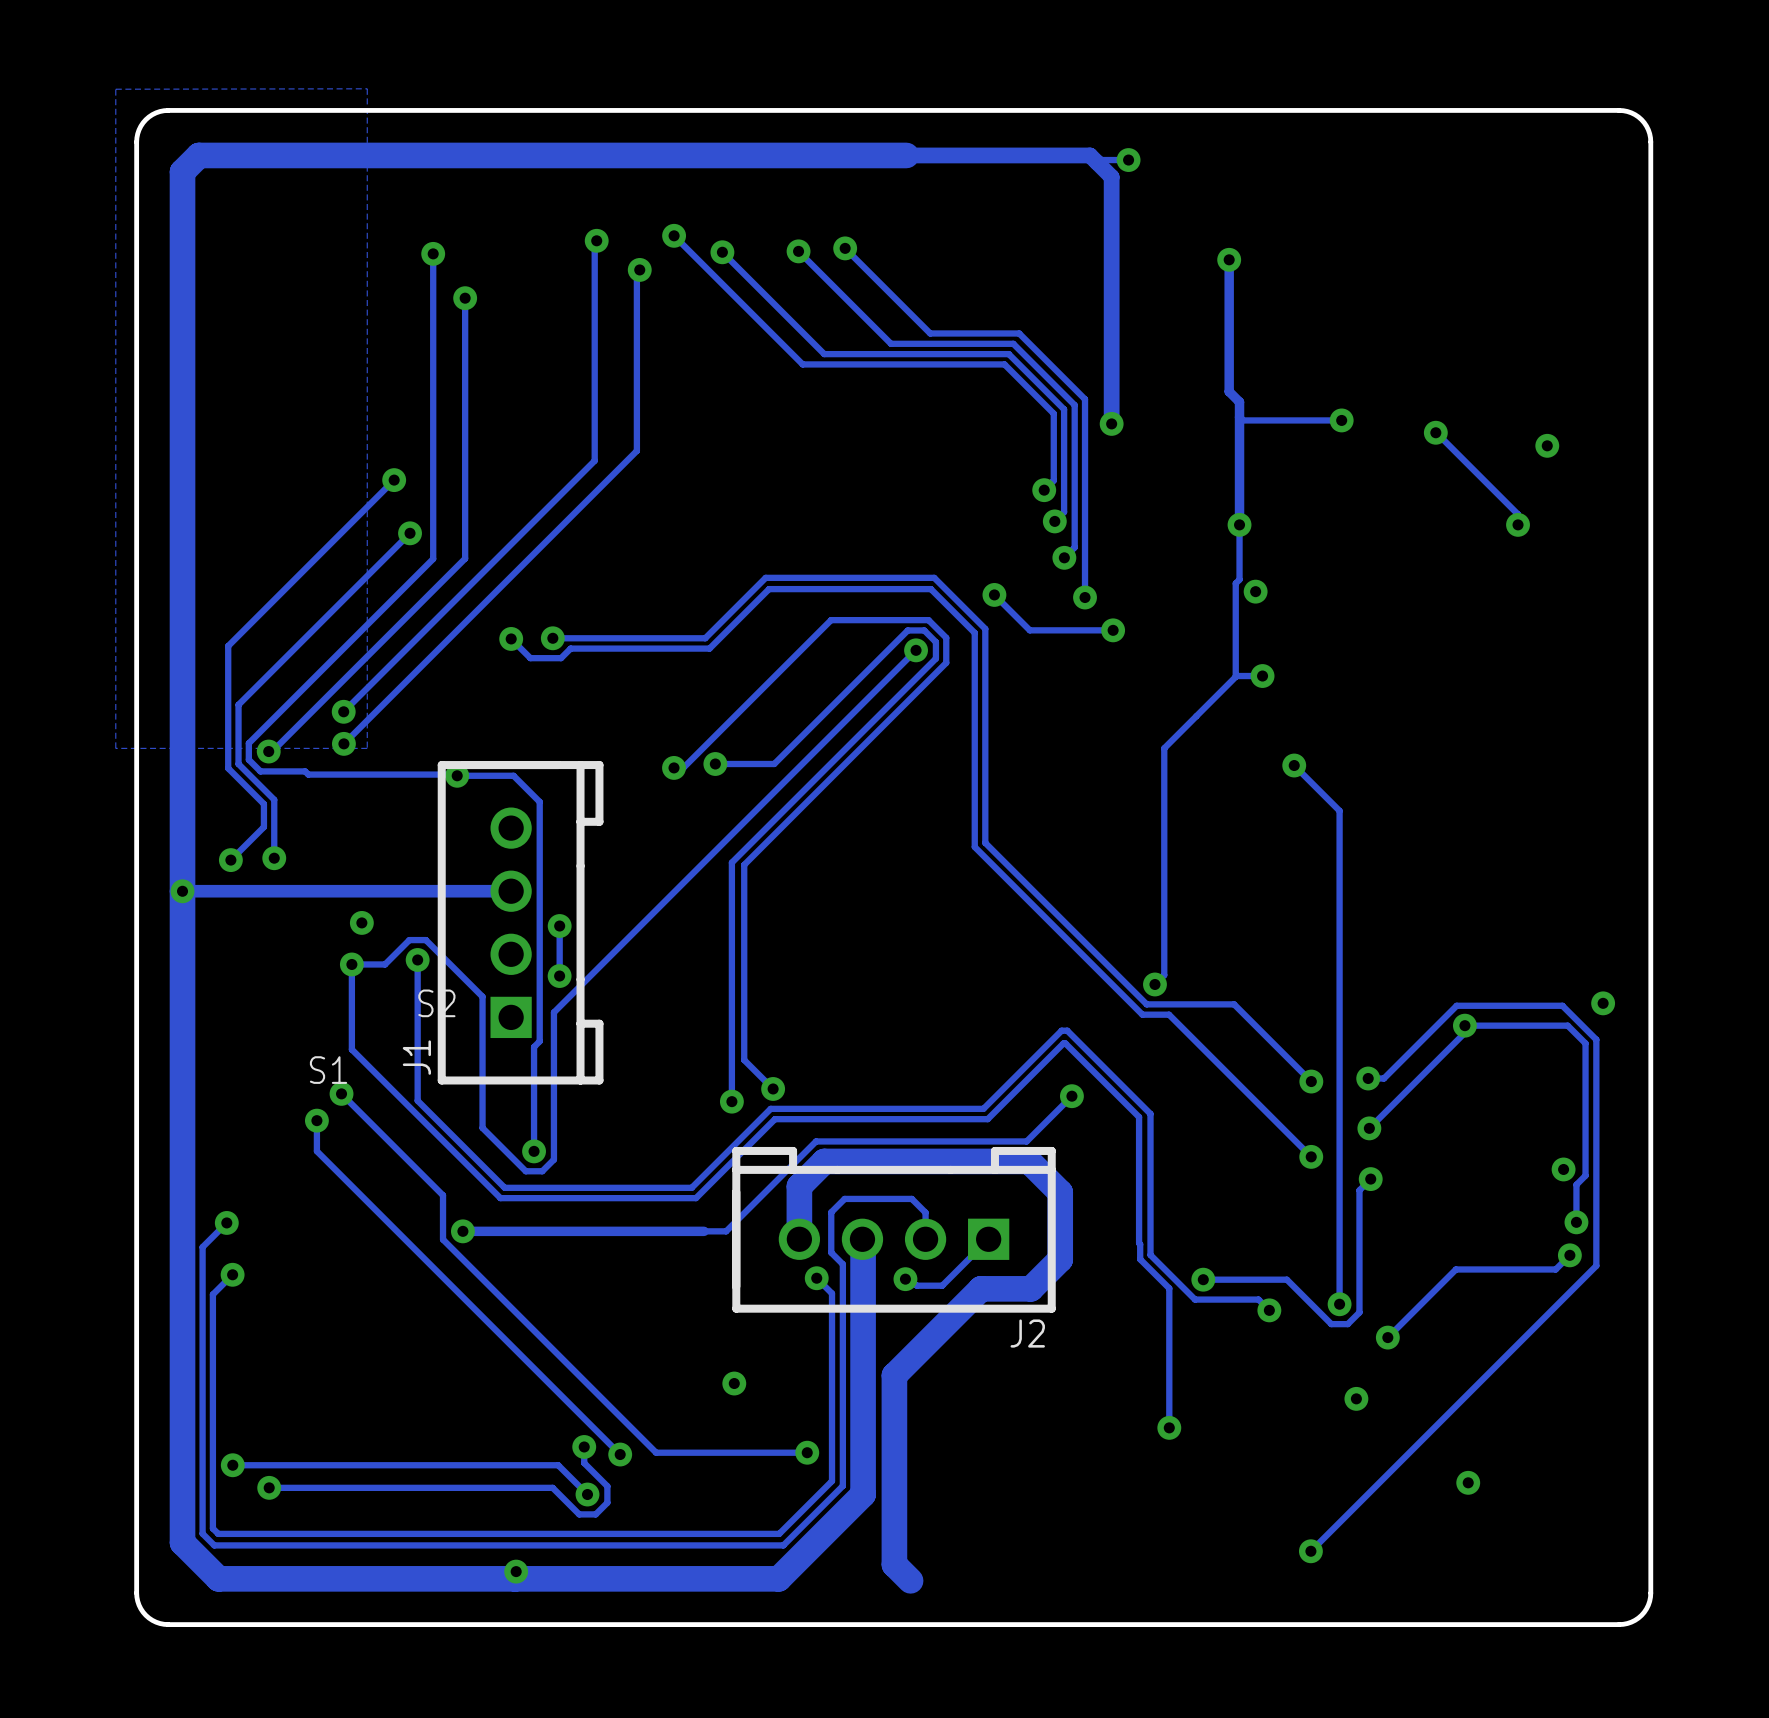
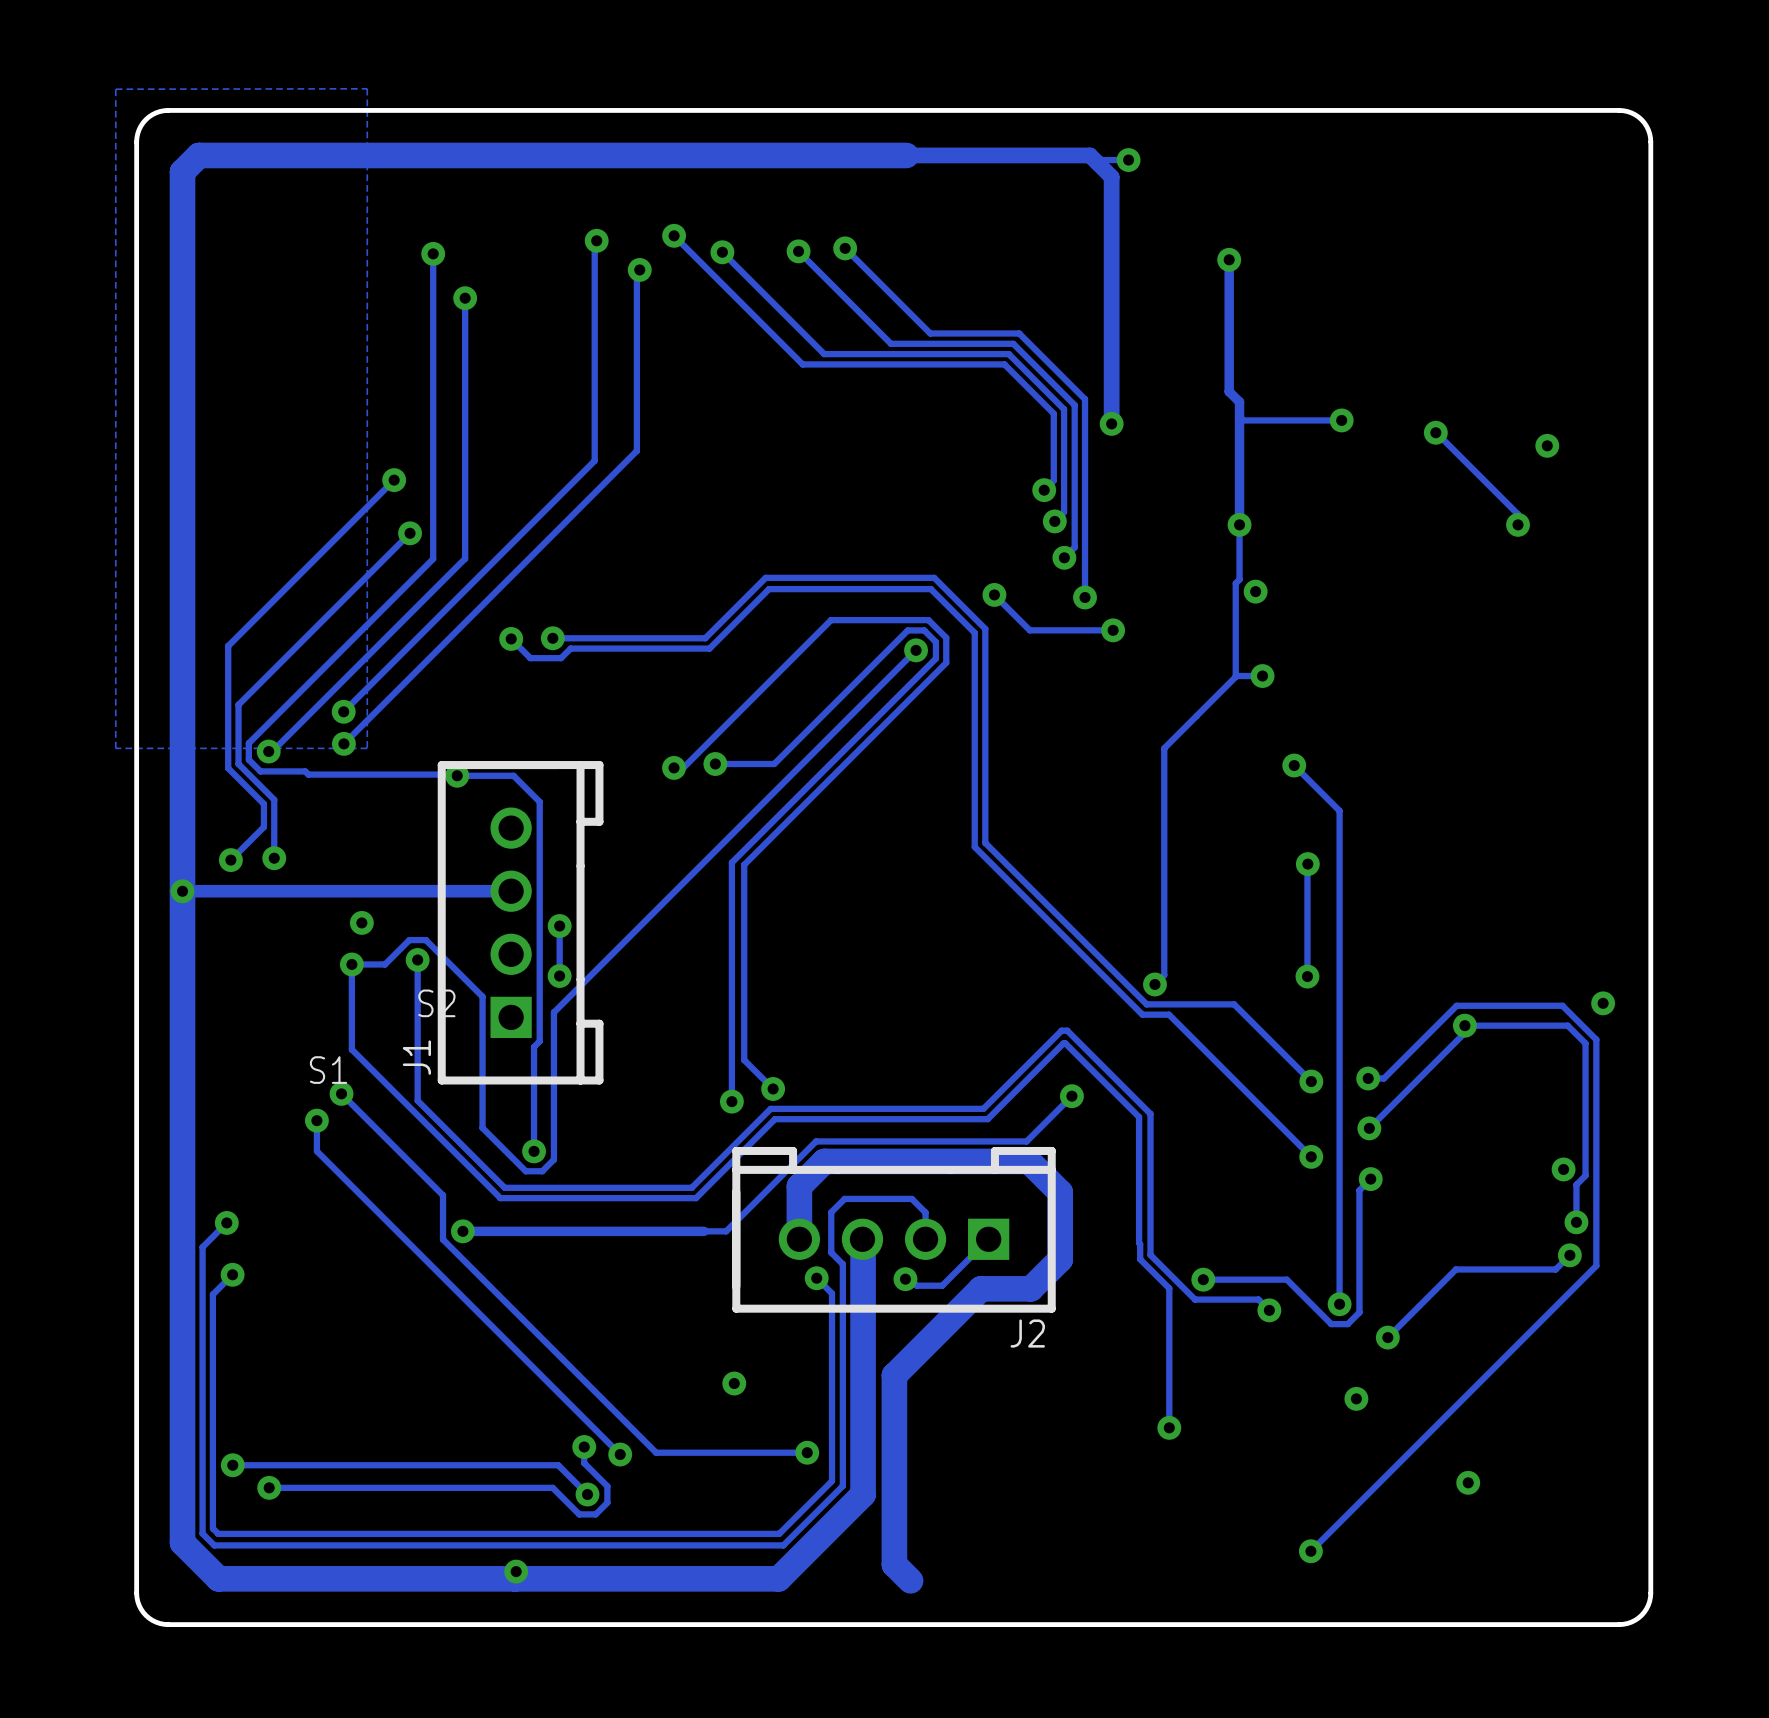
track: none -> (1307, 864) (1307, 976)
via: none -> (1307, 864)
via: none -> (1307, 976)

